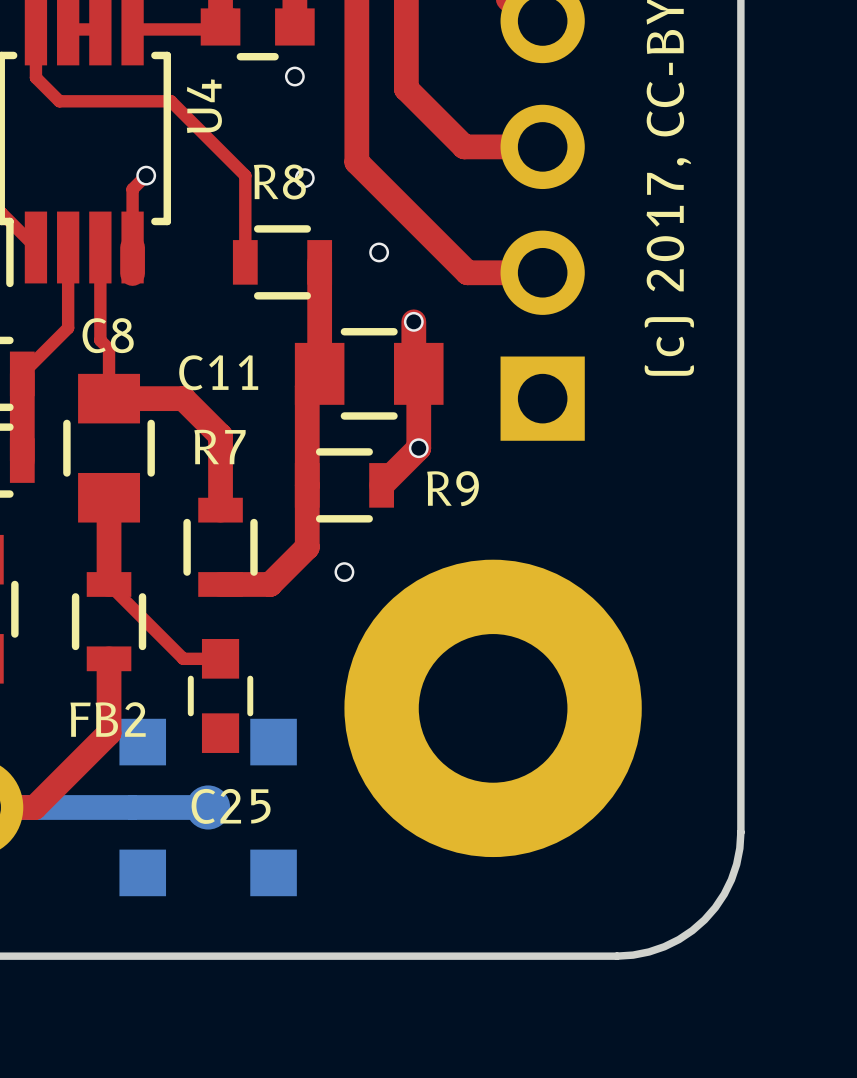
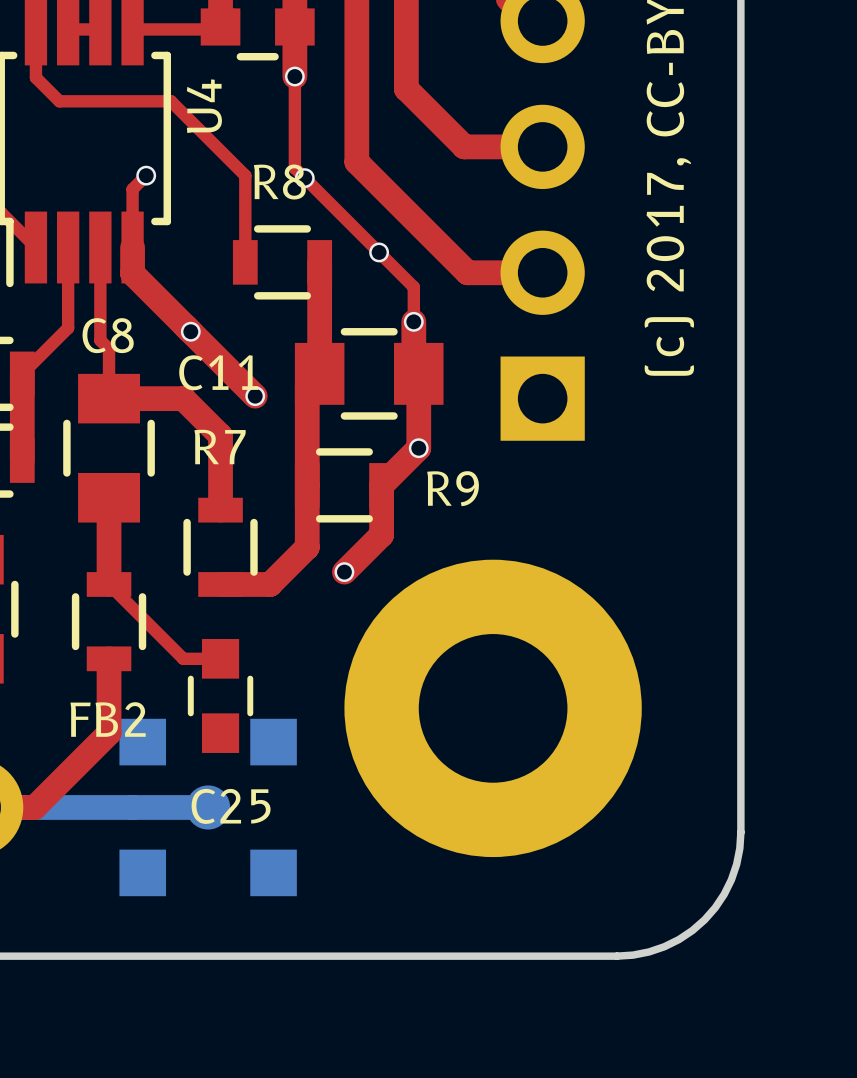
top track: none -> (294, 26) (294, 168) (413, 287) (413, 321)
top track: none -> (132, 273) (255, 396)
via: none -> (190, 331)
via: none -> (255, 396)
top track: none -> (381, 485) (381, 534) (344, 572)

